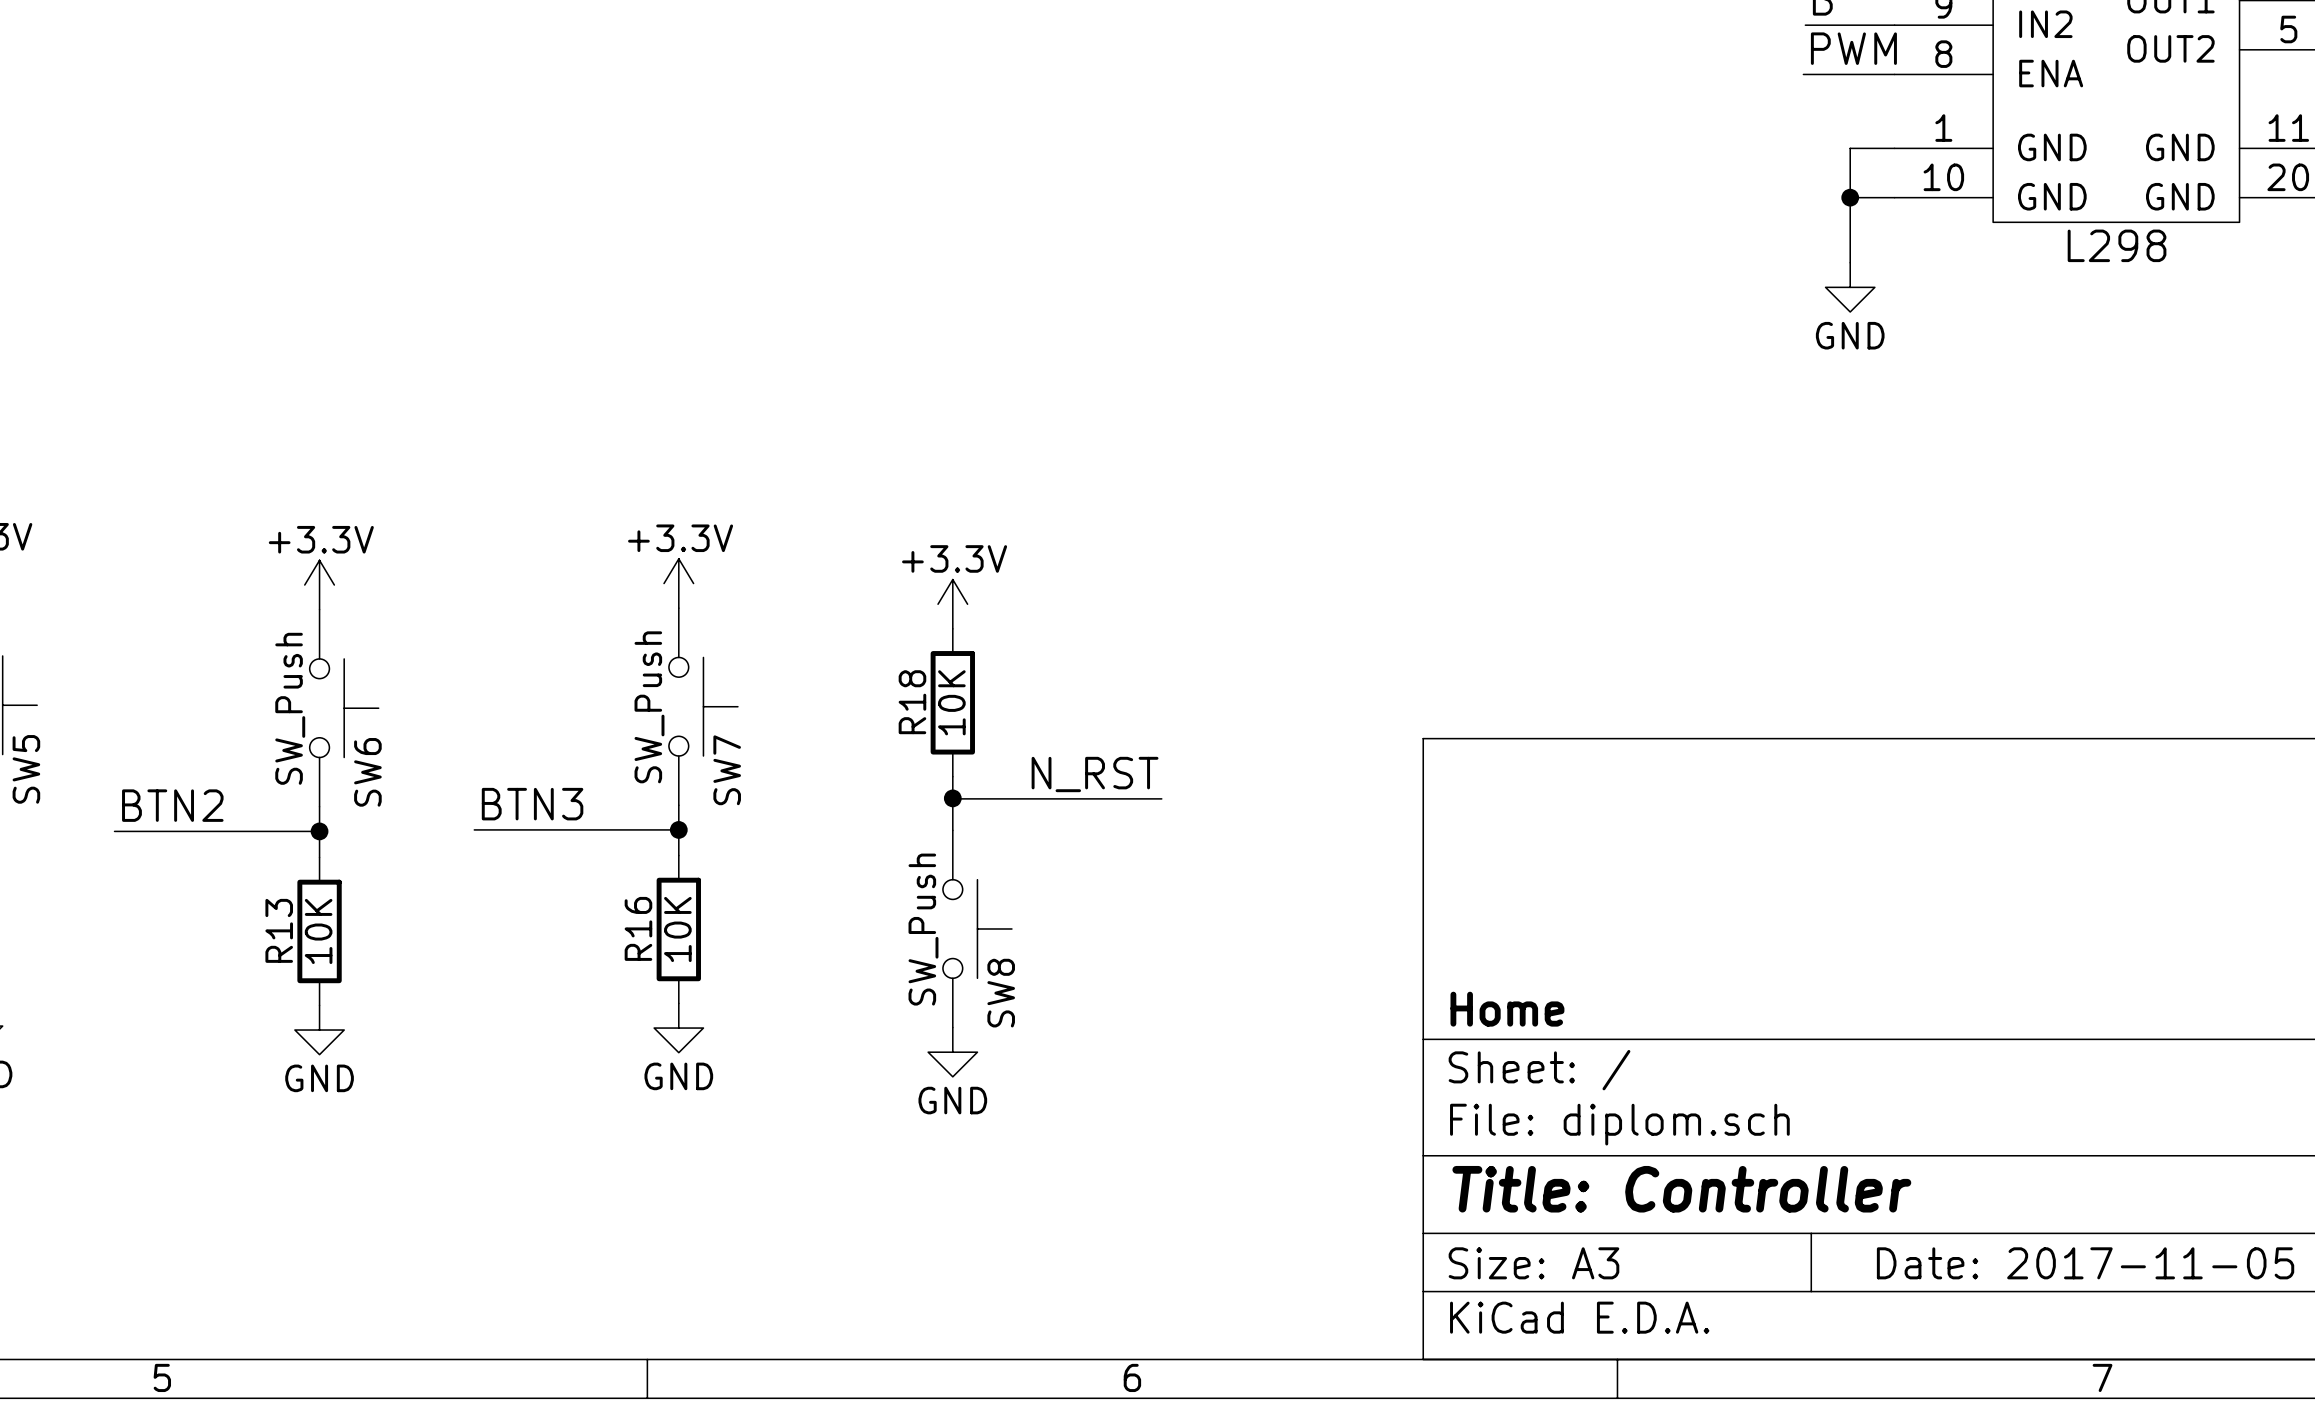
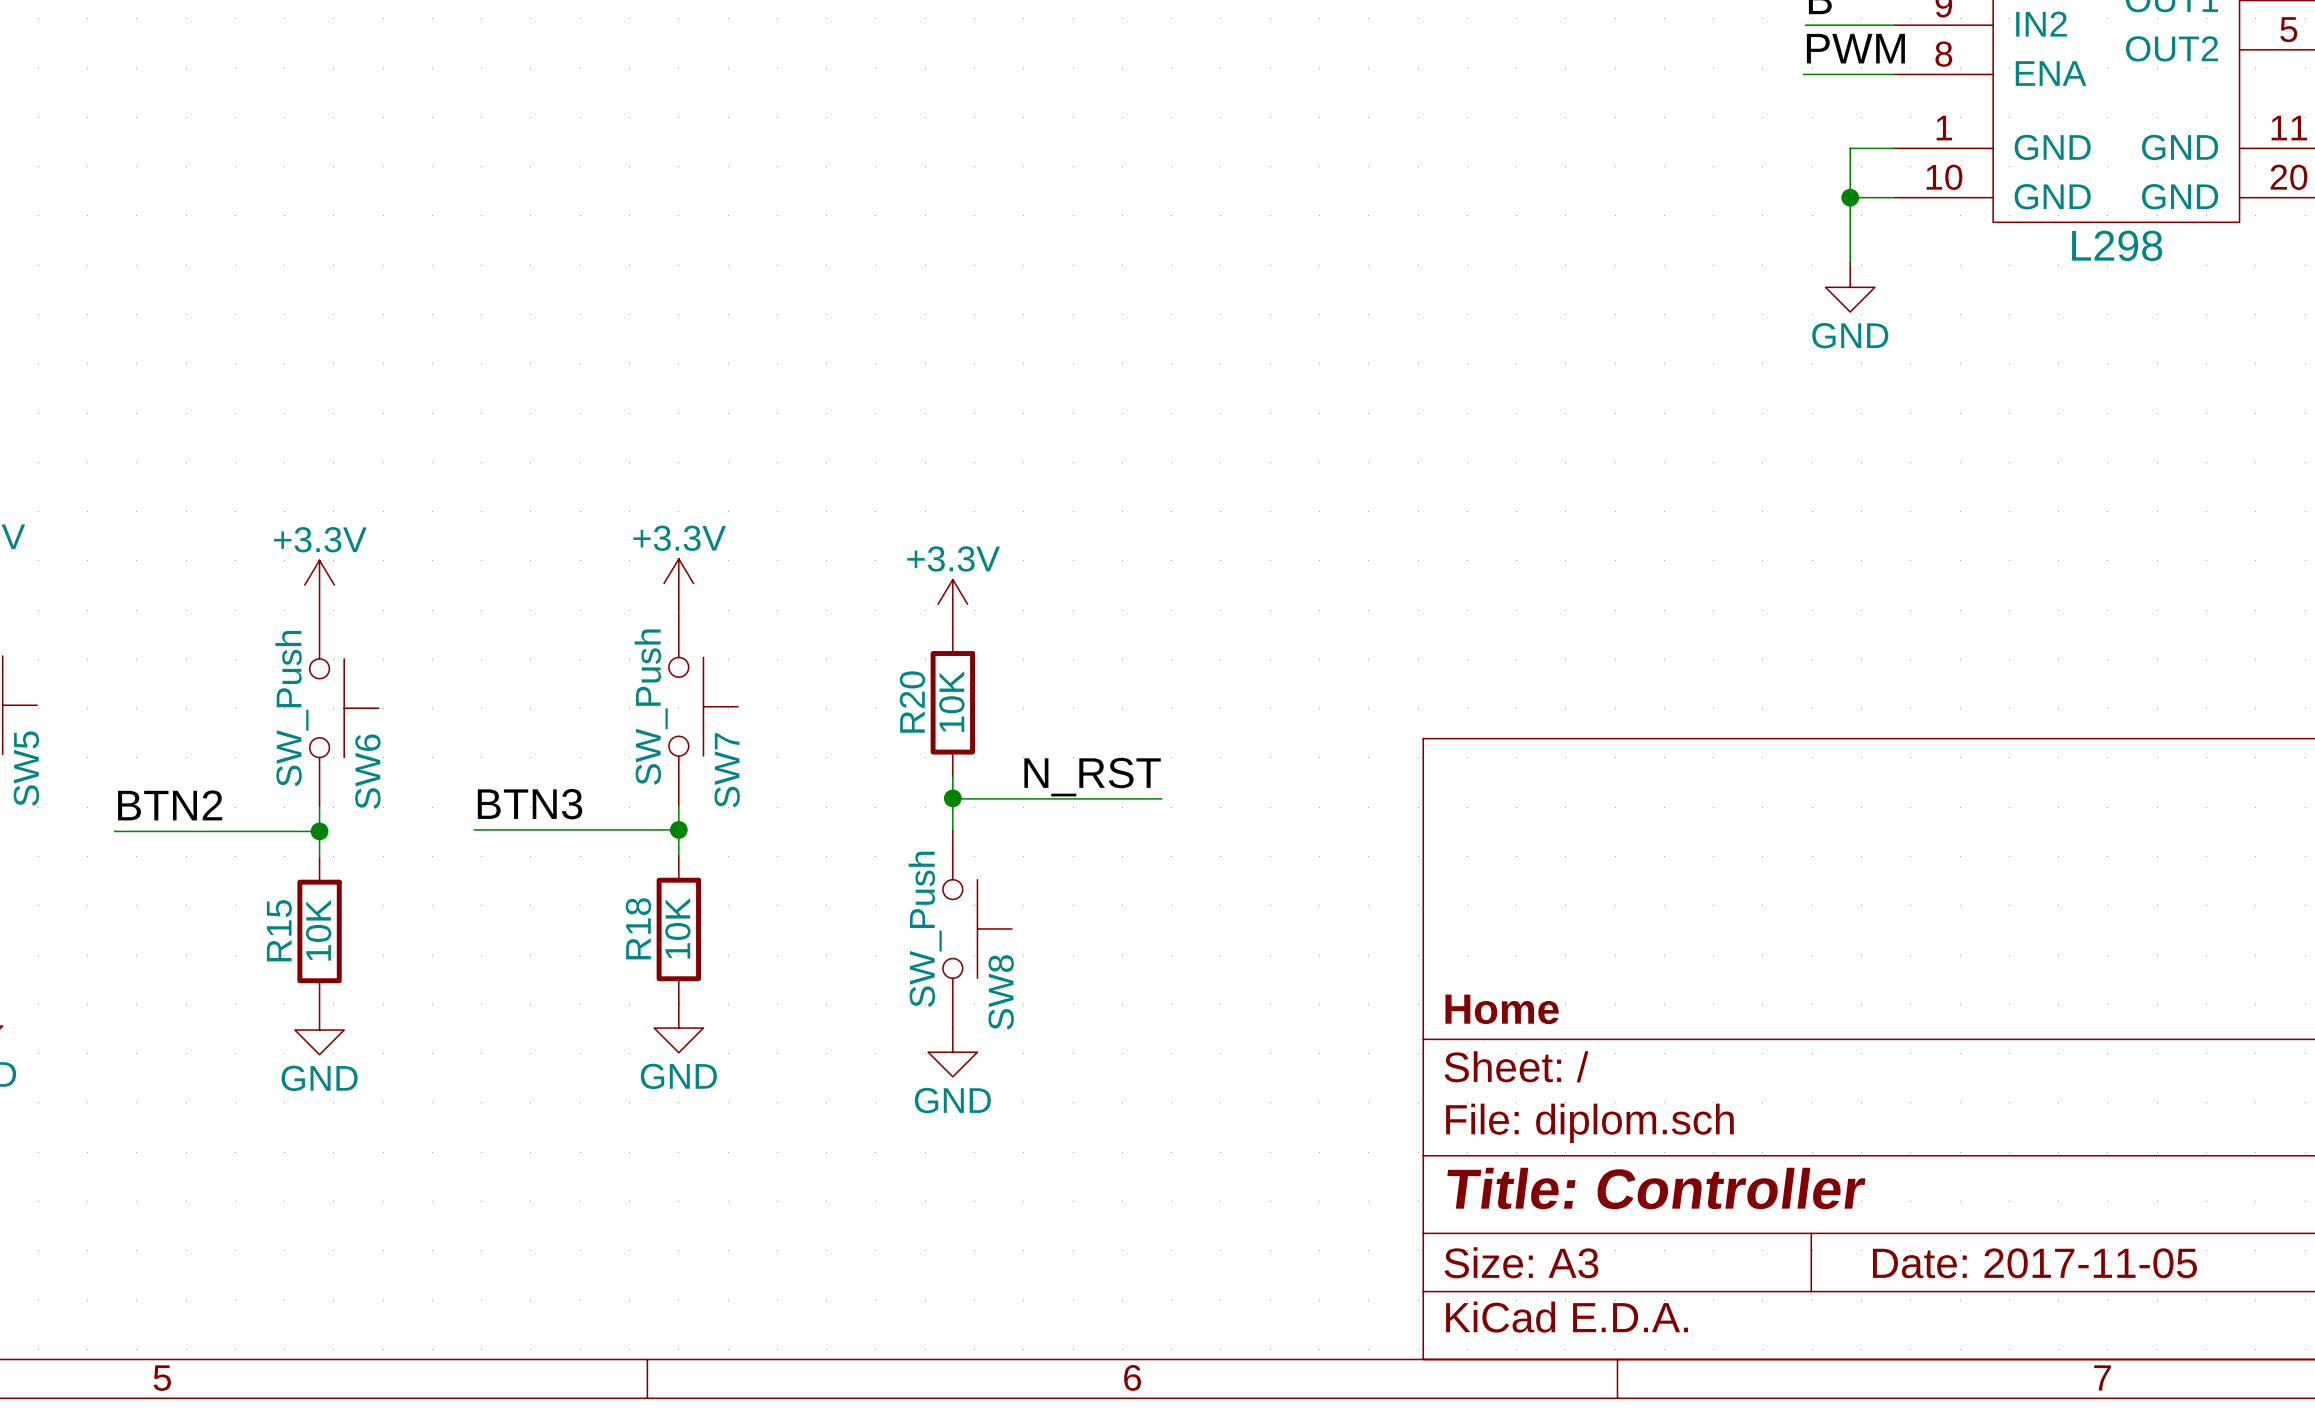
R18 name: R18 (912, 702) -> R20 (912, 702)
R16 name: R16 (638, 928) -> R18 (638, 928)
R13 name: R13 (279, 930) -> R15 (279, 930)

